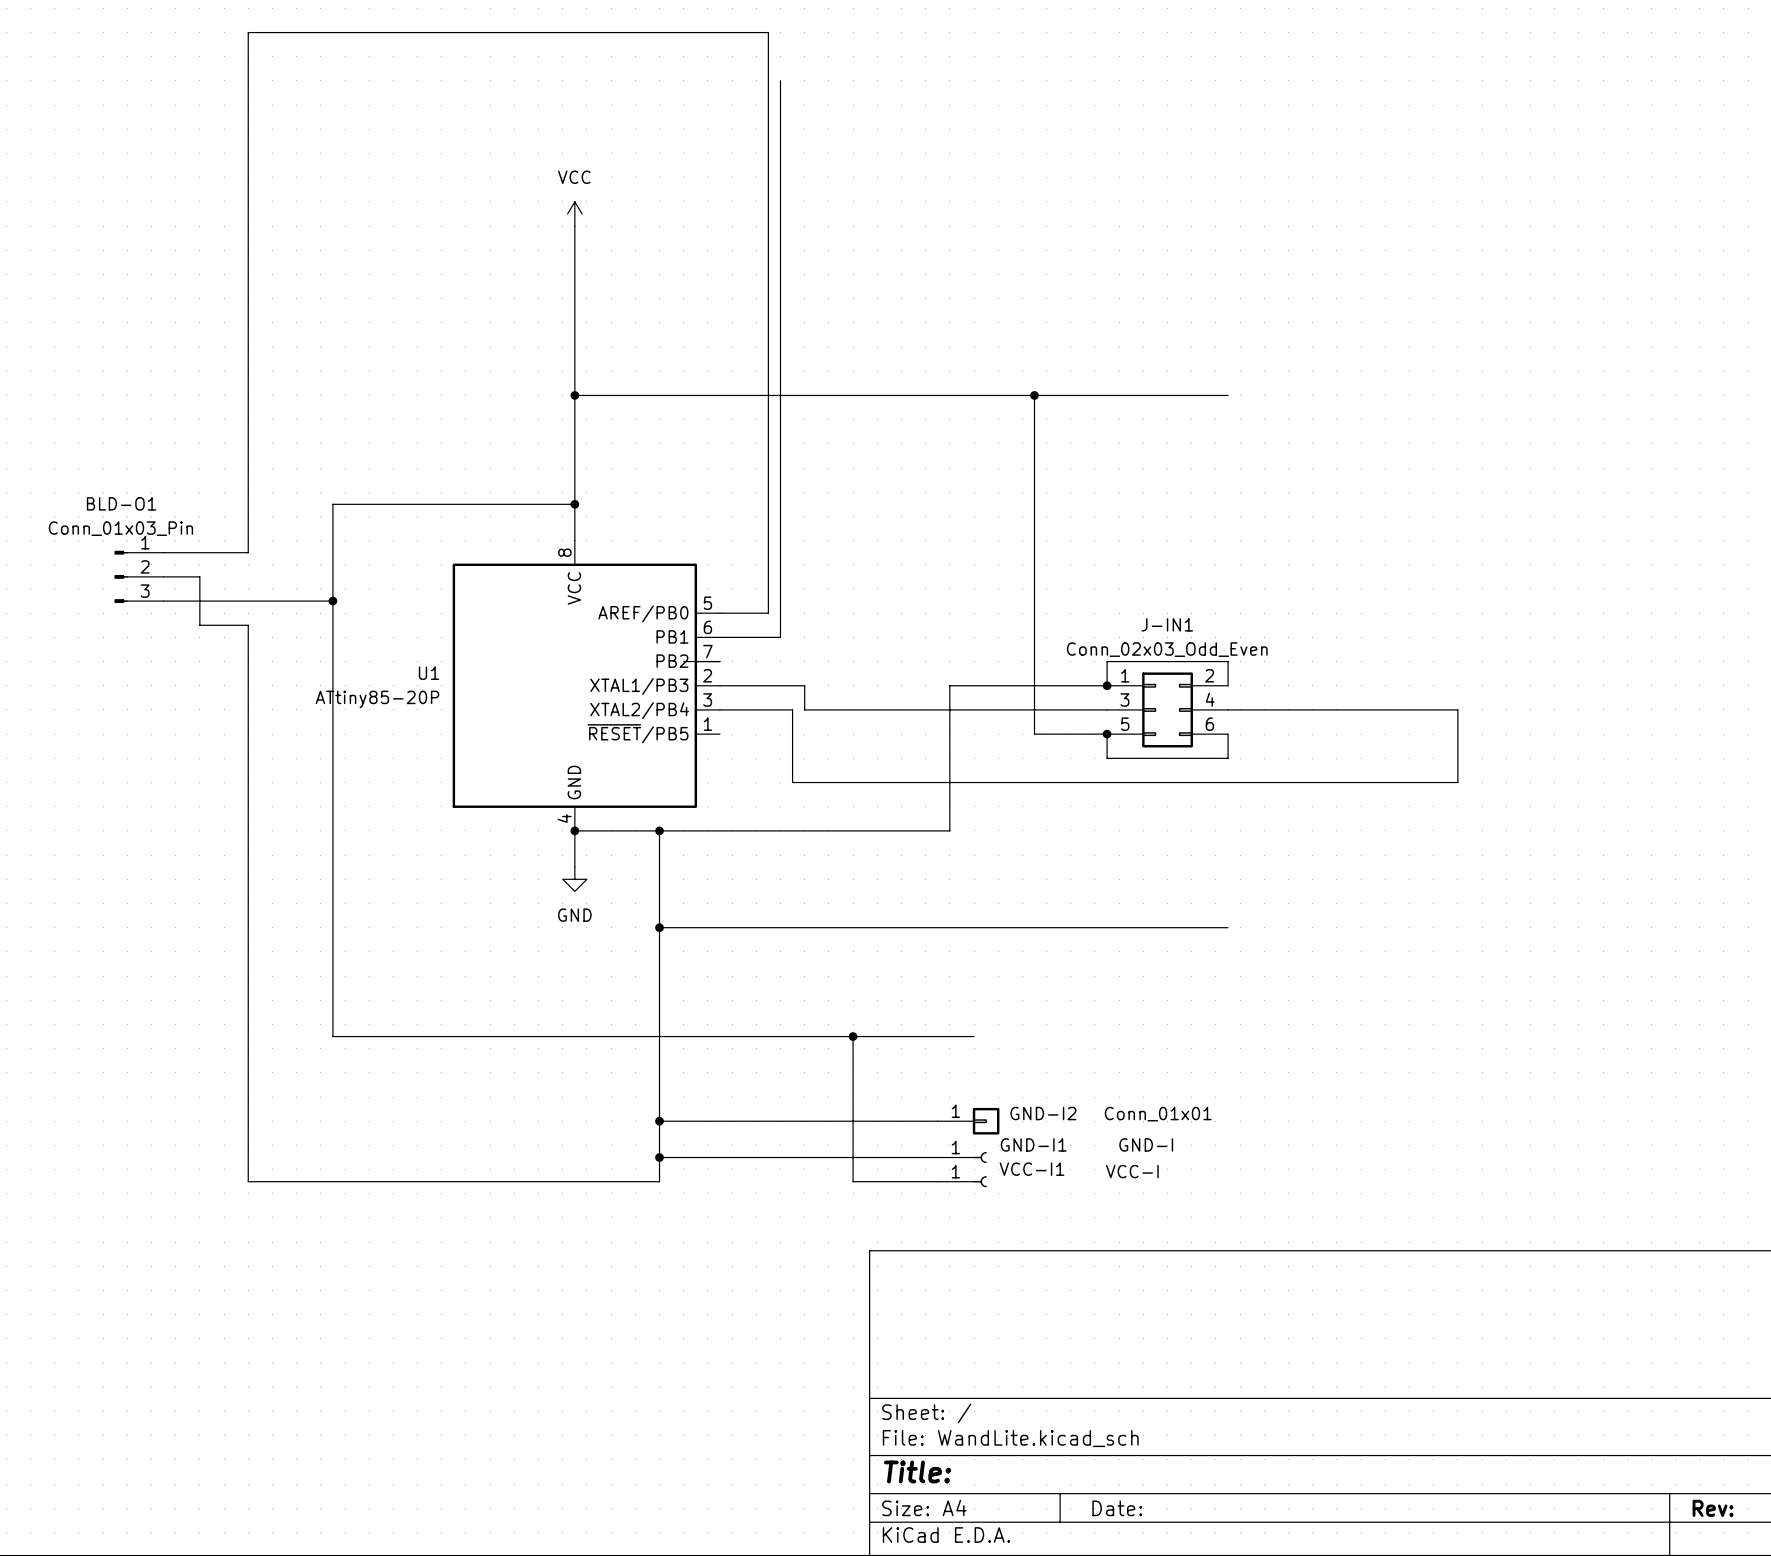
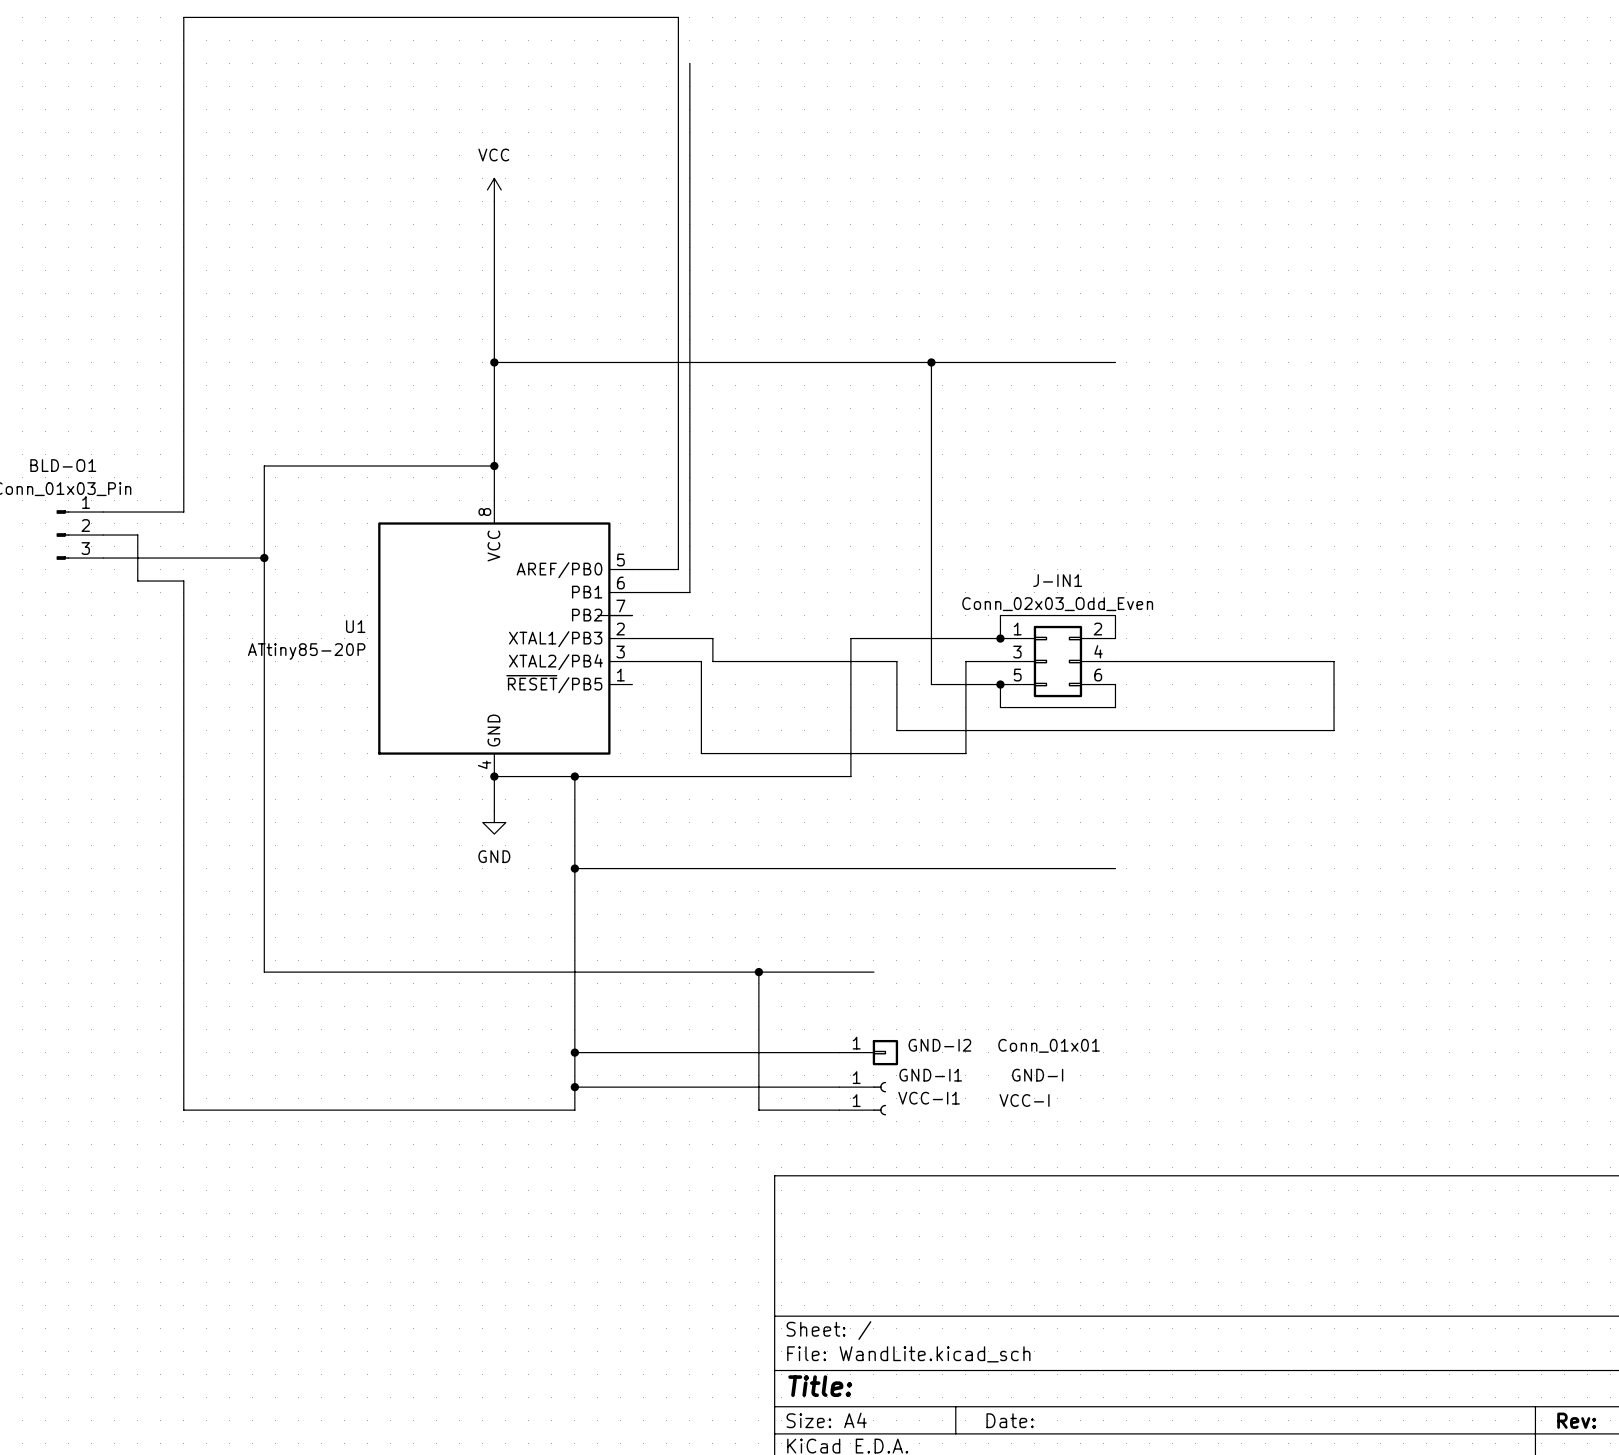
wire: (998, 709) (1070, 709) -> (896, 661) (896, 730)
wire: (792, 782) (998, 782) -> (701, 730) (701, 753) (965, 753) (965, 661)

